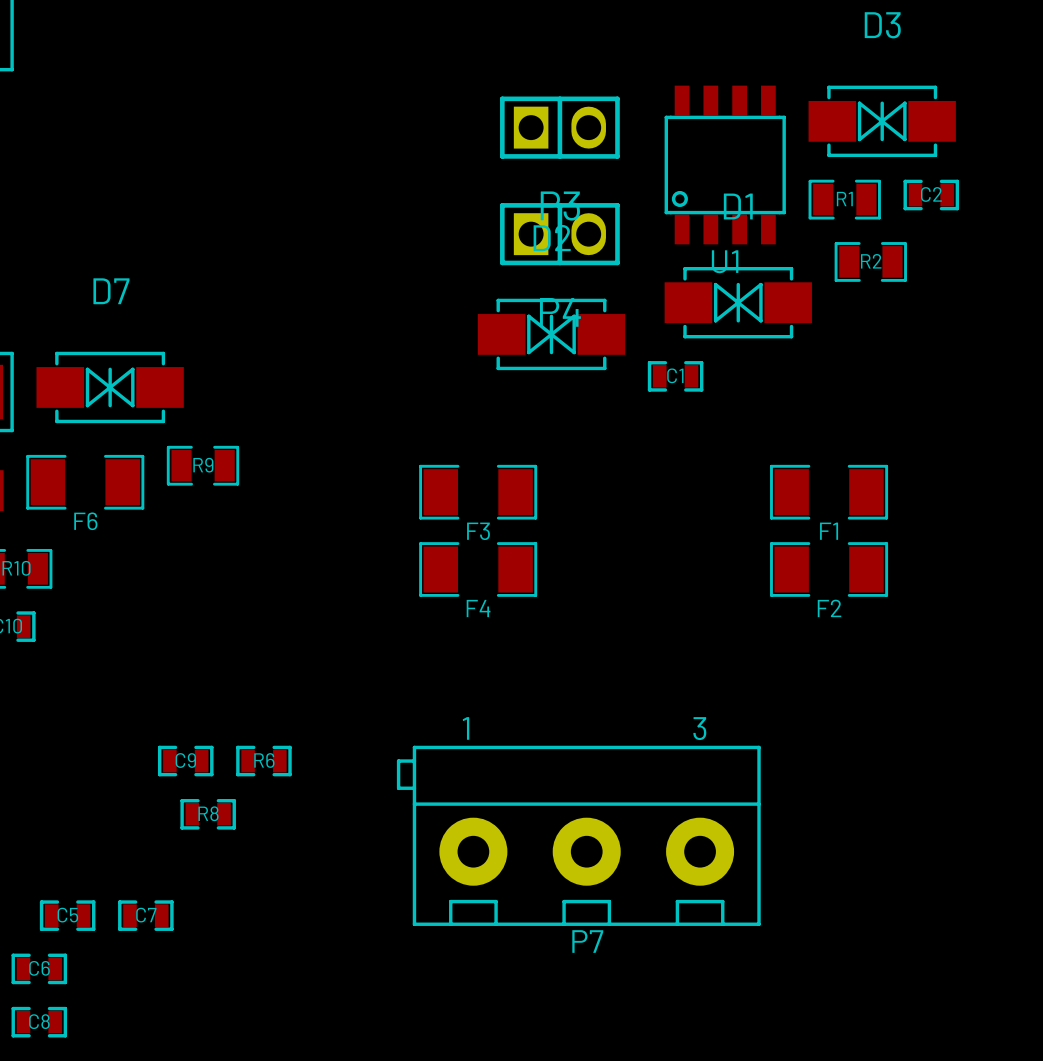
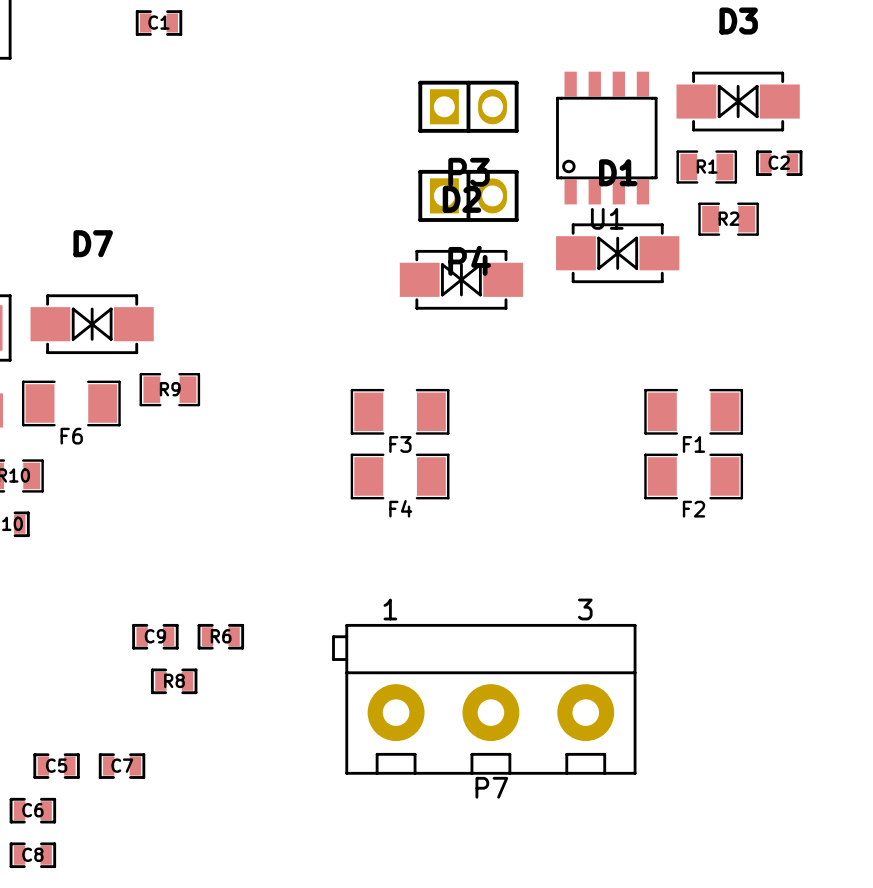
C1 position: (675, 376) -> (159, 23)

